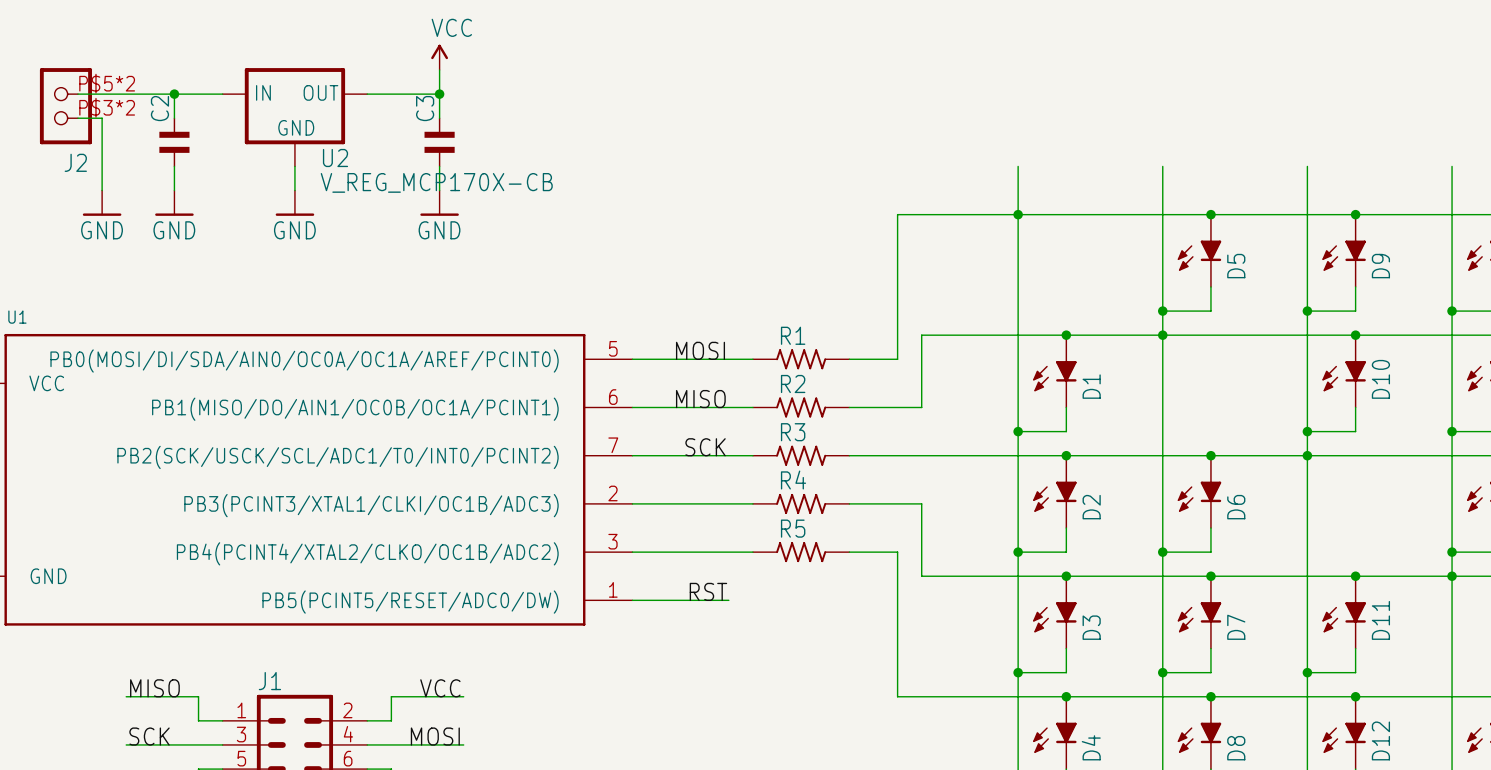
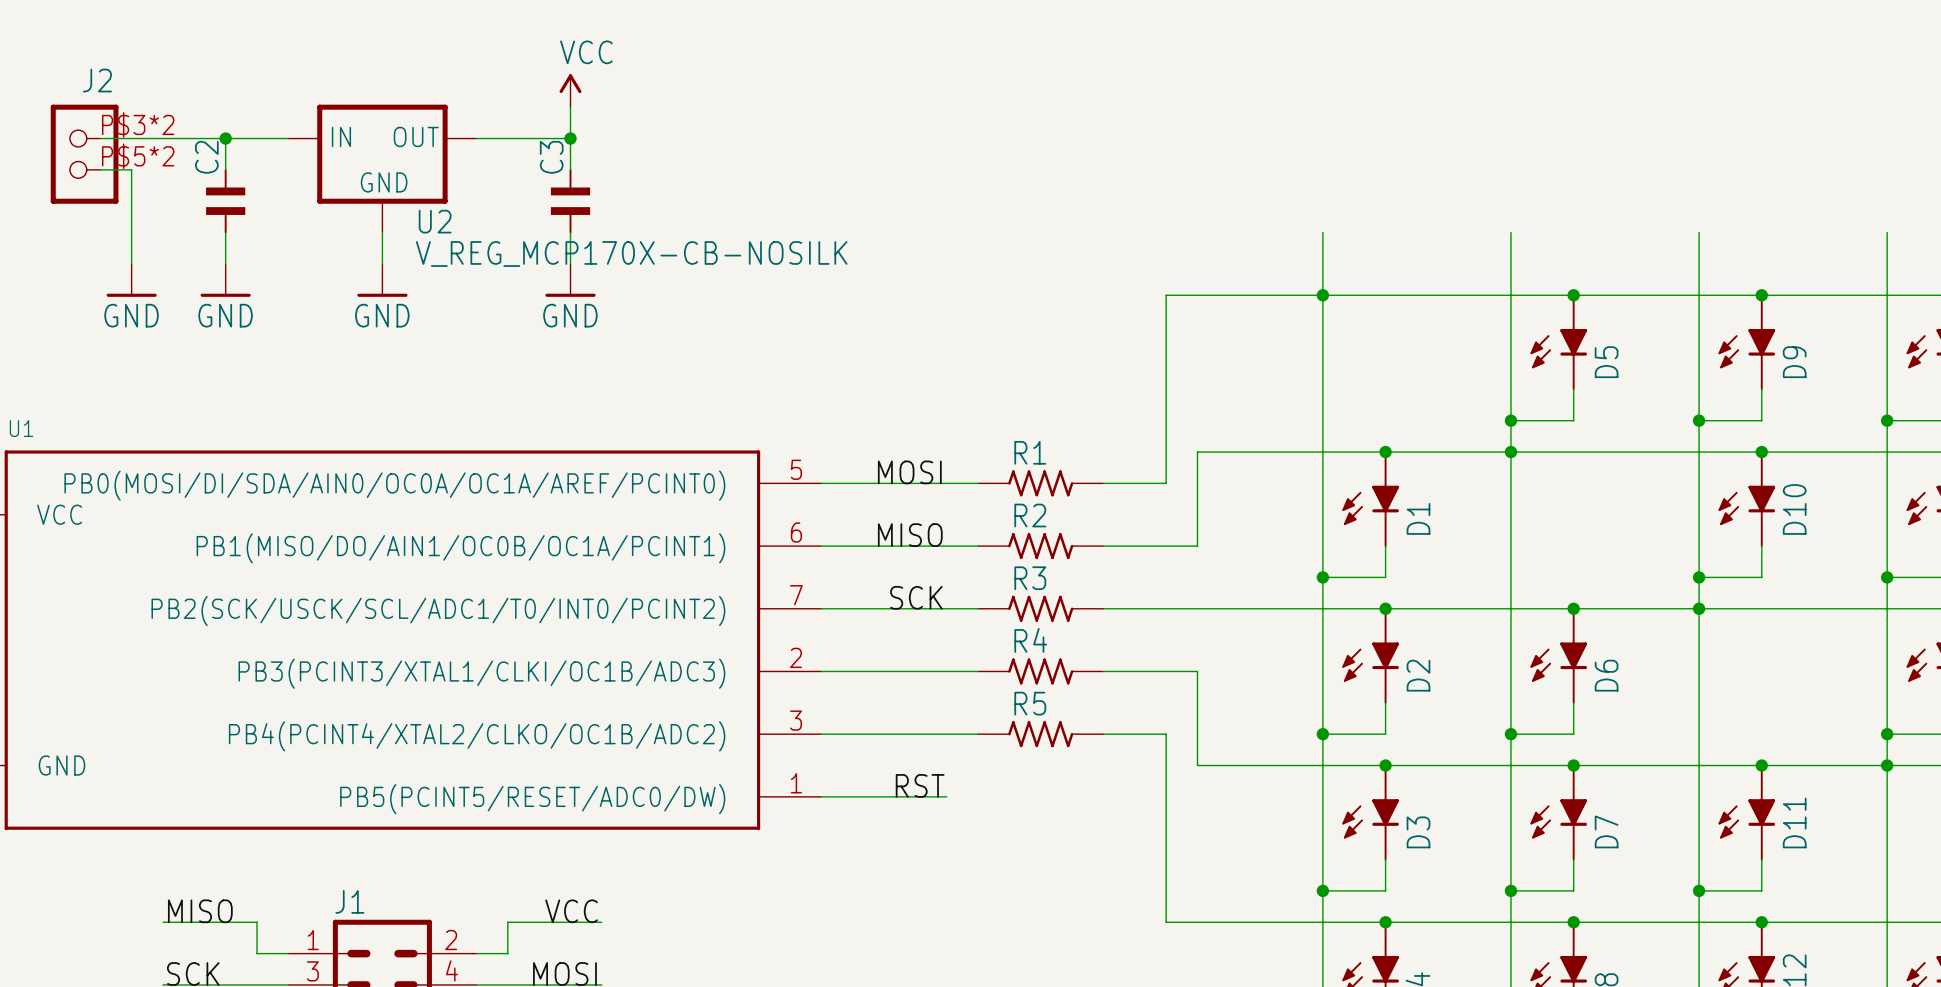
J2 flip: as is (65, 106) -> up-down (84, 154)
U2 value: V_REG_MCP170X-CB (436, 182) -> V_REG_MCP170X-CB-NOSILK (631, 254)

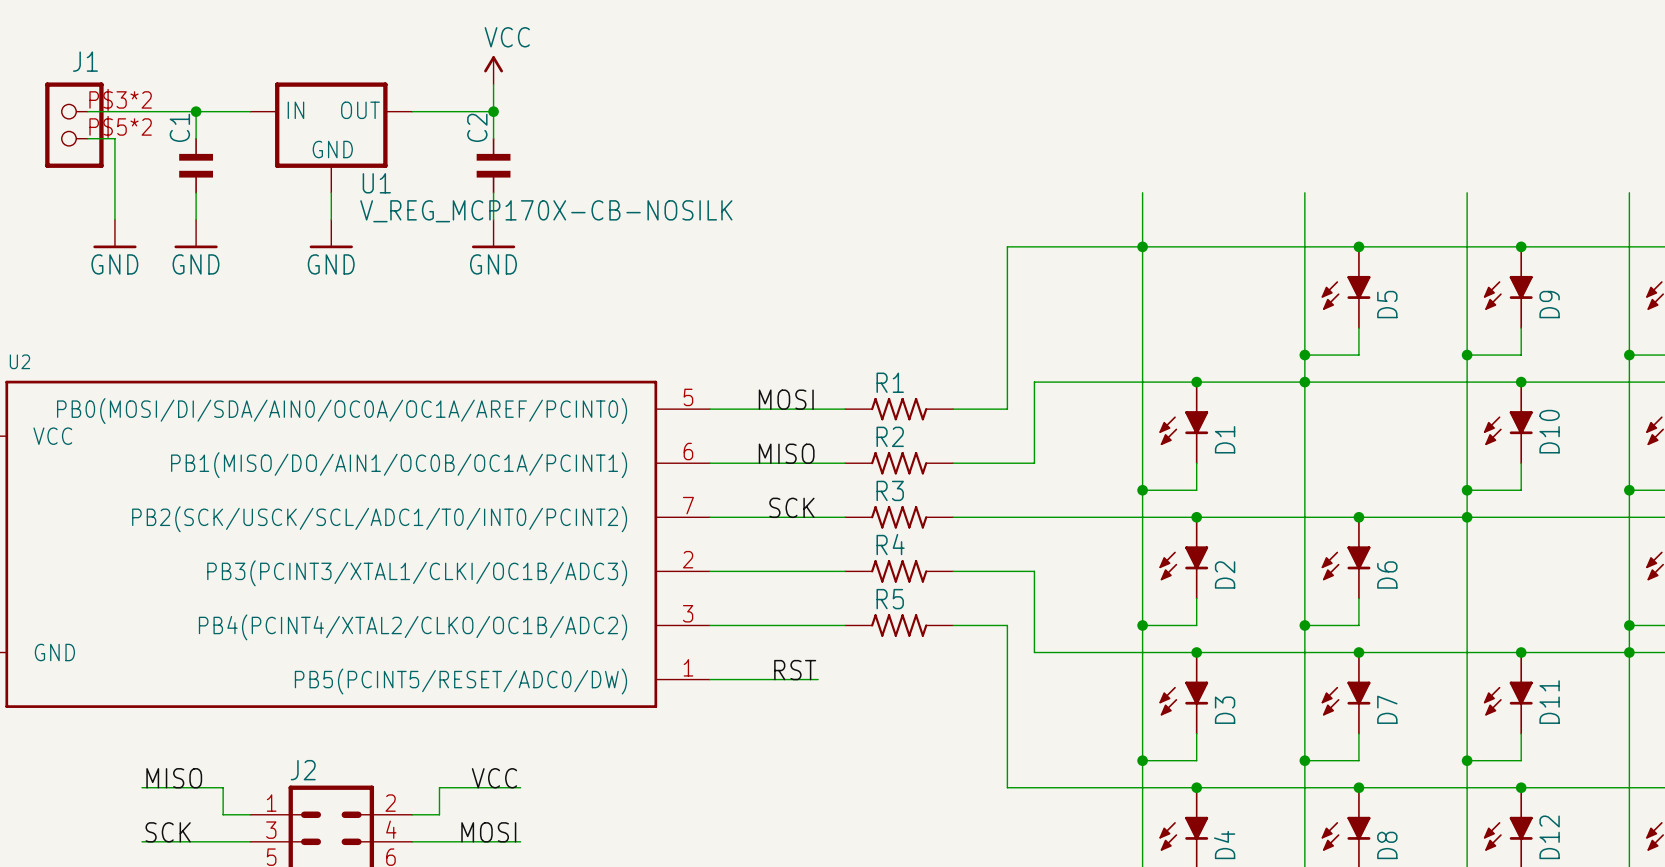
J2 name: J2 (97, 80) -> J1 (85, 61)
C2 name: C2 (206, 157) -> C1 (179, 127)
C3 name: C3 (551, 157) -> C2 (477, 127)
U2 name: U2 (435, 221) -> U1 (376, 183)
U1 name: U1 (21, 428) -> U2 (19, 361)
J1 name: J1 (349, 901) -> J2 (303, 770)

